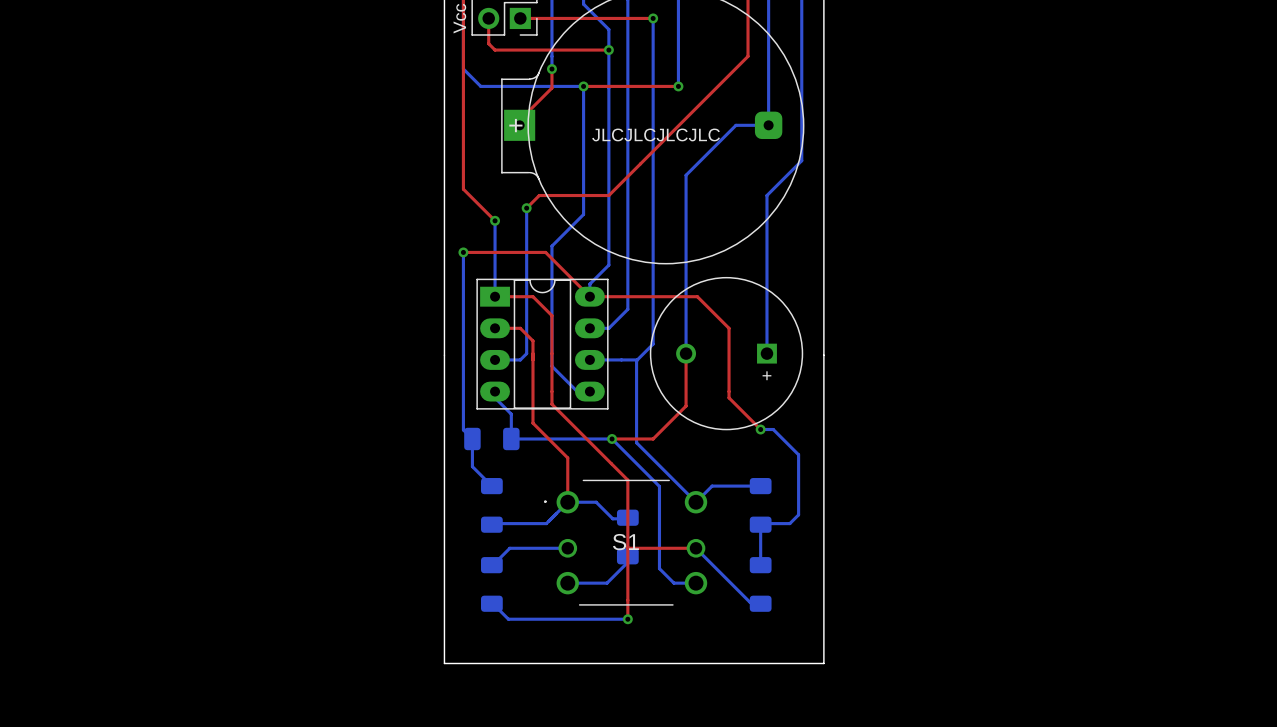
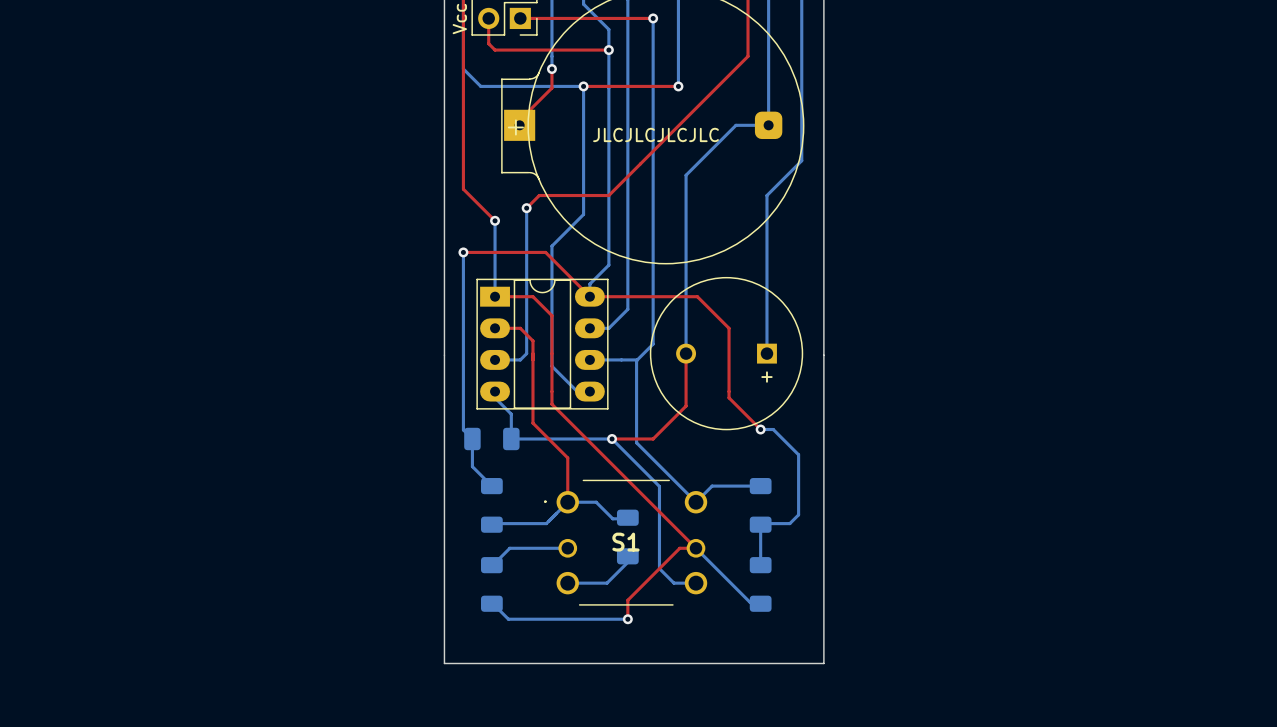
top track: (627, 480) (627, 600) -> (627, 480) (695, 548)
top track: (627, 547) (679, 548) -> (627, 600) (679, 548)

